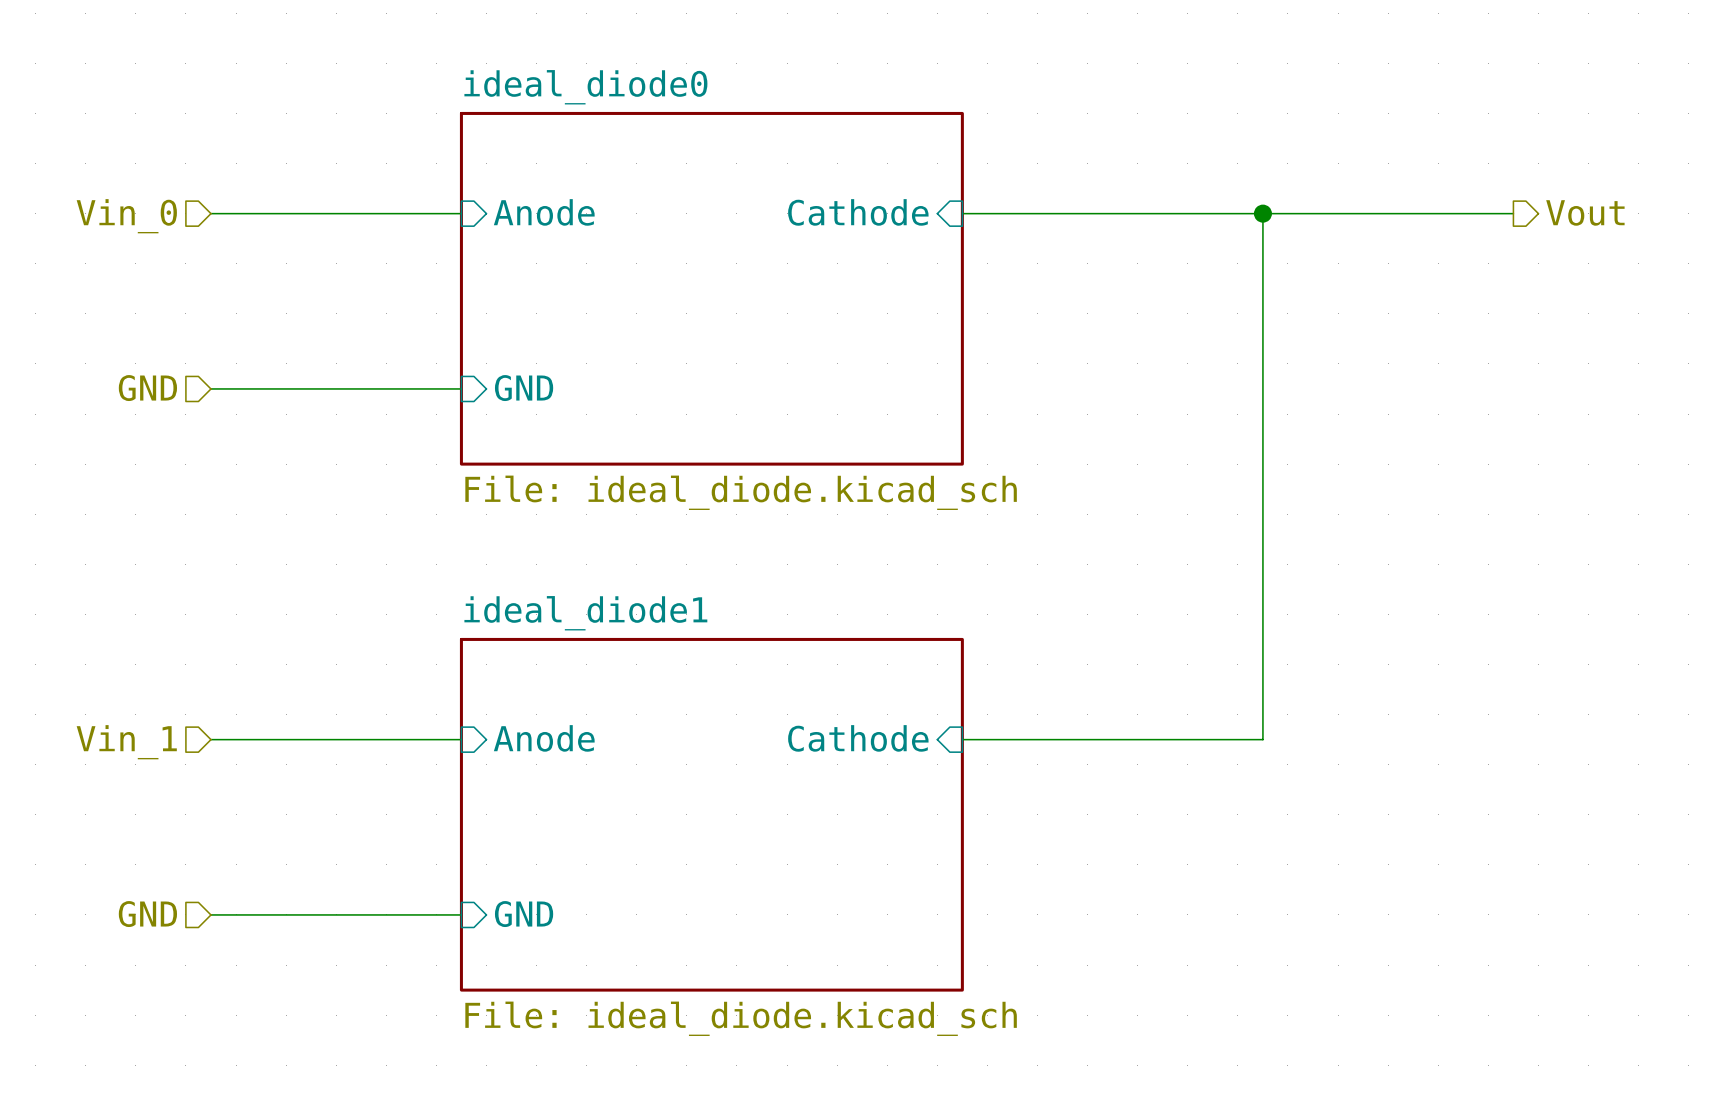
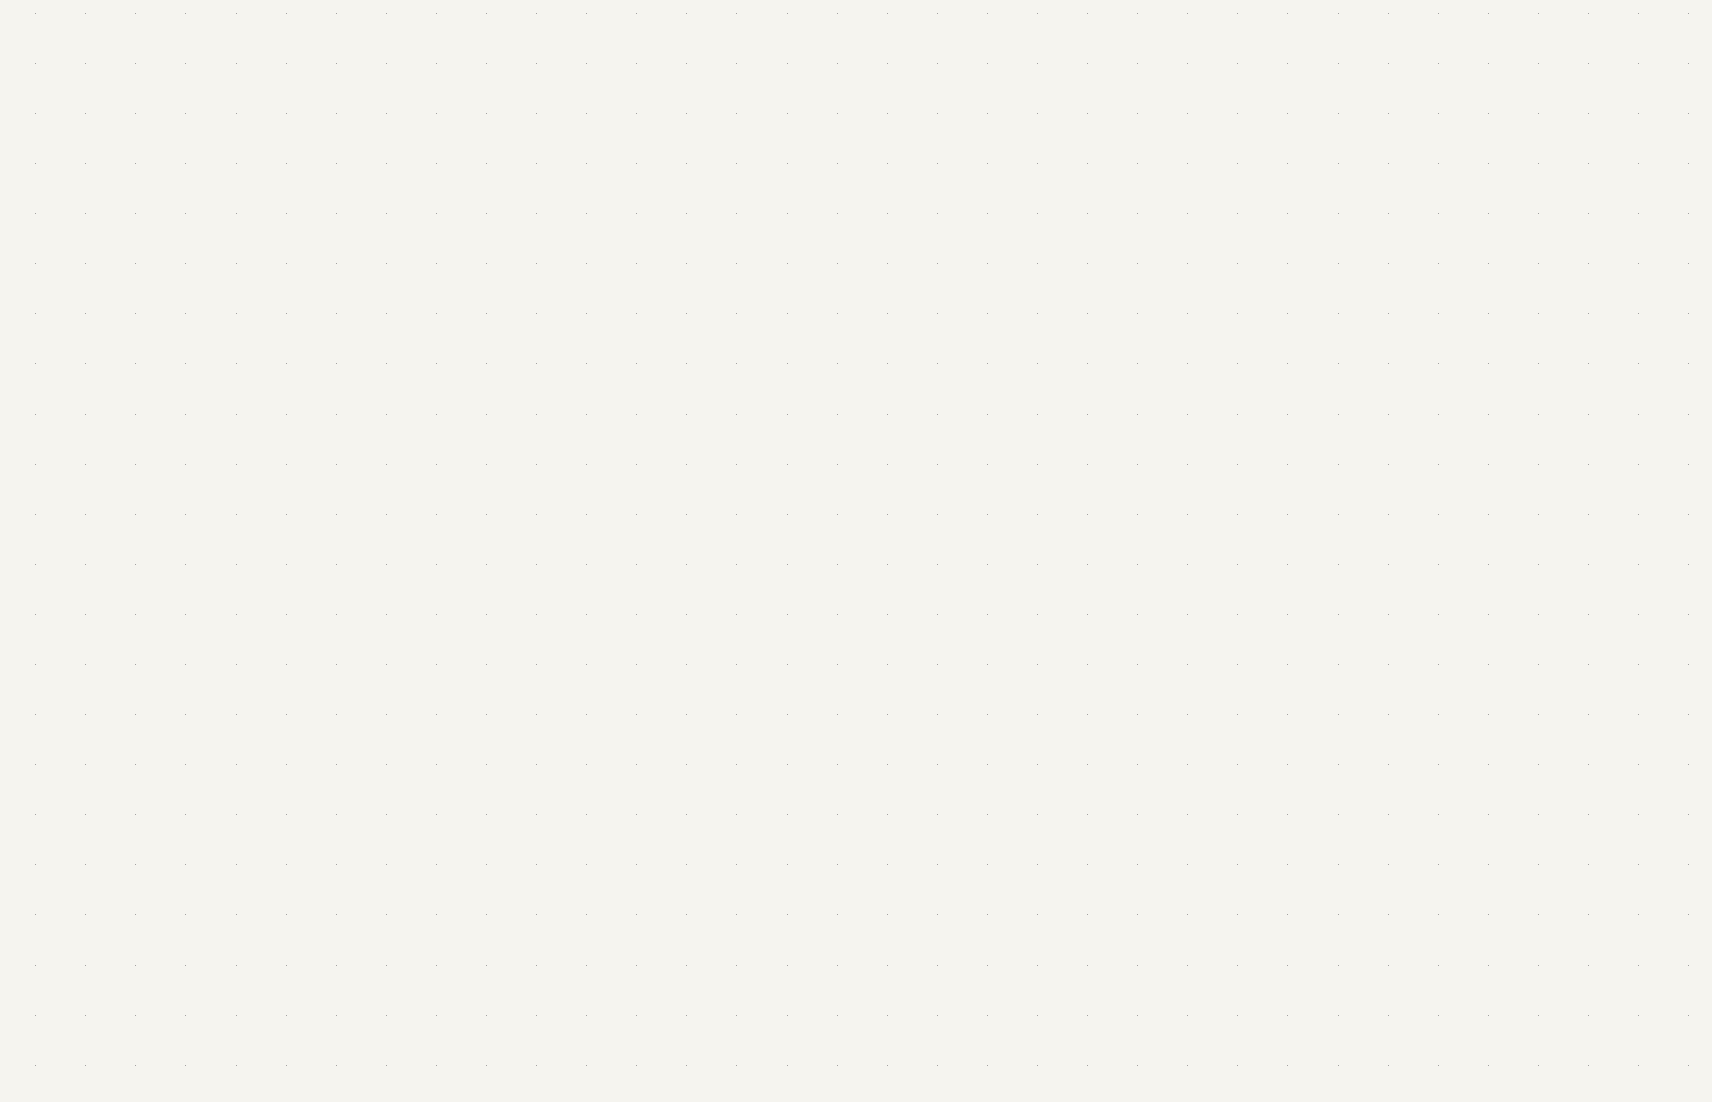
sheet pin: Anode (544, 212) -> none
sheet pin: Cathode (858, 212) -> none
hierarchical label: Vout (1585, 212) -> none
wire: (210, 213) (461, 213) -> none
wire: (962, 213) (1513, 213) -> none
wire: (1262, 213) (1262, 739) (962, 739) -> none
junction: (1262, 213) -> none
hierarchical label: Vin_0 (126, 216) -> none
sheet ideal_diode0: File: ideal_diode.kicad_sch (711, 288) -> none
hierarchical label: GND (147, 388) -> none
wire: (210, 388) (461, 388) -> none
sheet pin: GND (524, 388) -> none
sheet pin: Anode (544, 738) -> none
sheet pin: Cathode (858, 738) -> none
wire: (210, 739) (461, 739) -> none
hierarchical label: Vin_1 (126, 742) -> none
sheet ideal_diode1: File: ideal_diode.kicad_sch (711, 814) -> none
hierarchical label: GND (147, 914) -> none
wire: (210, 914) (461, 914) -> none
sheet pin: GND (524, 914) -> none

